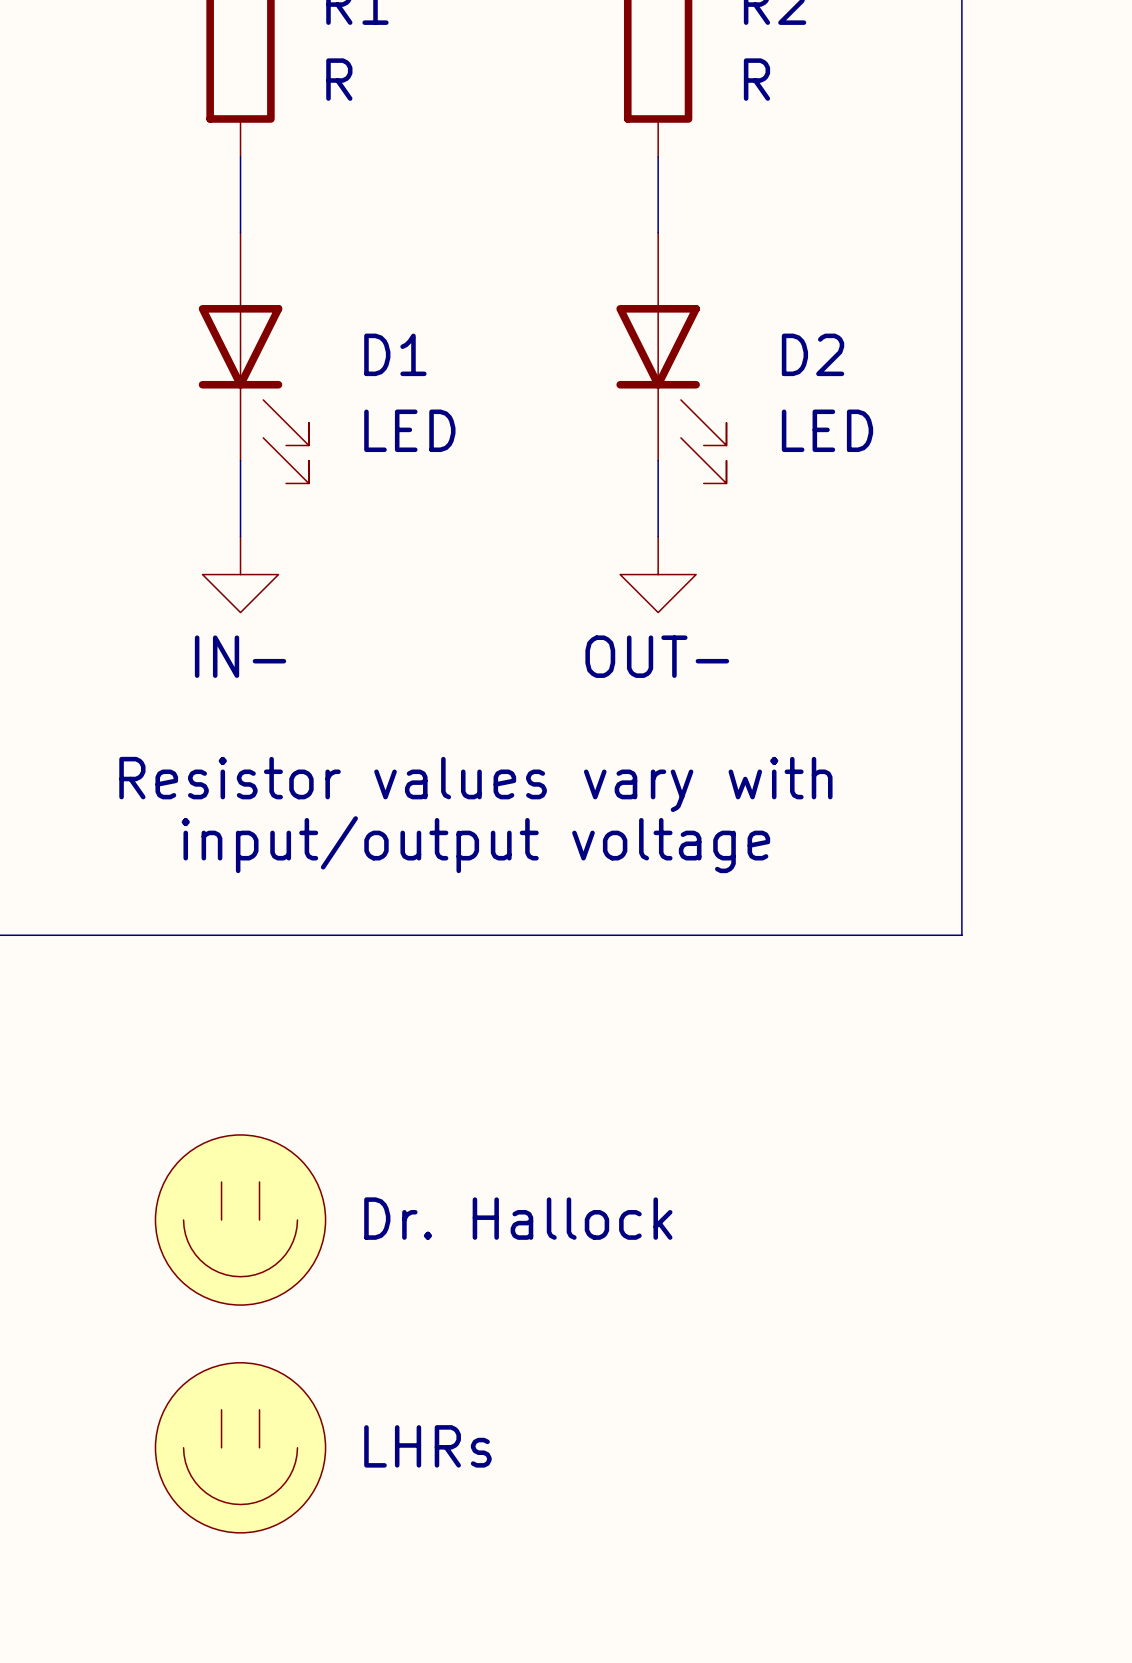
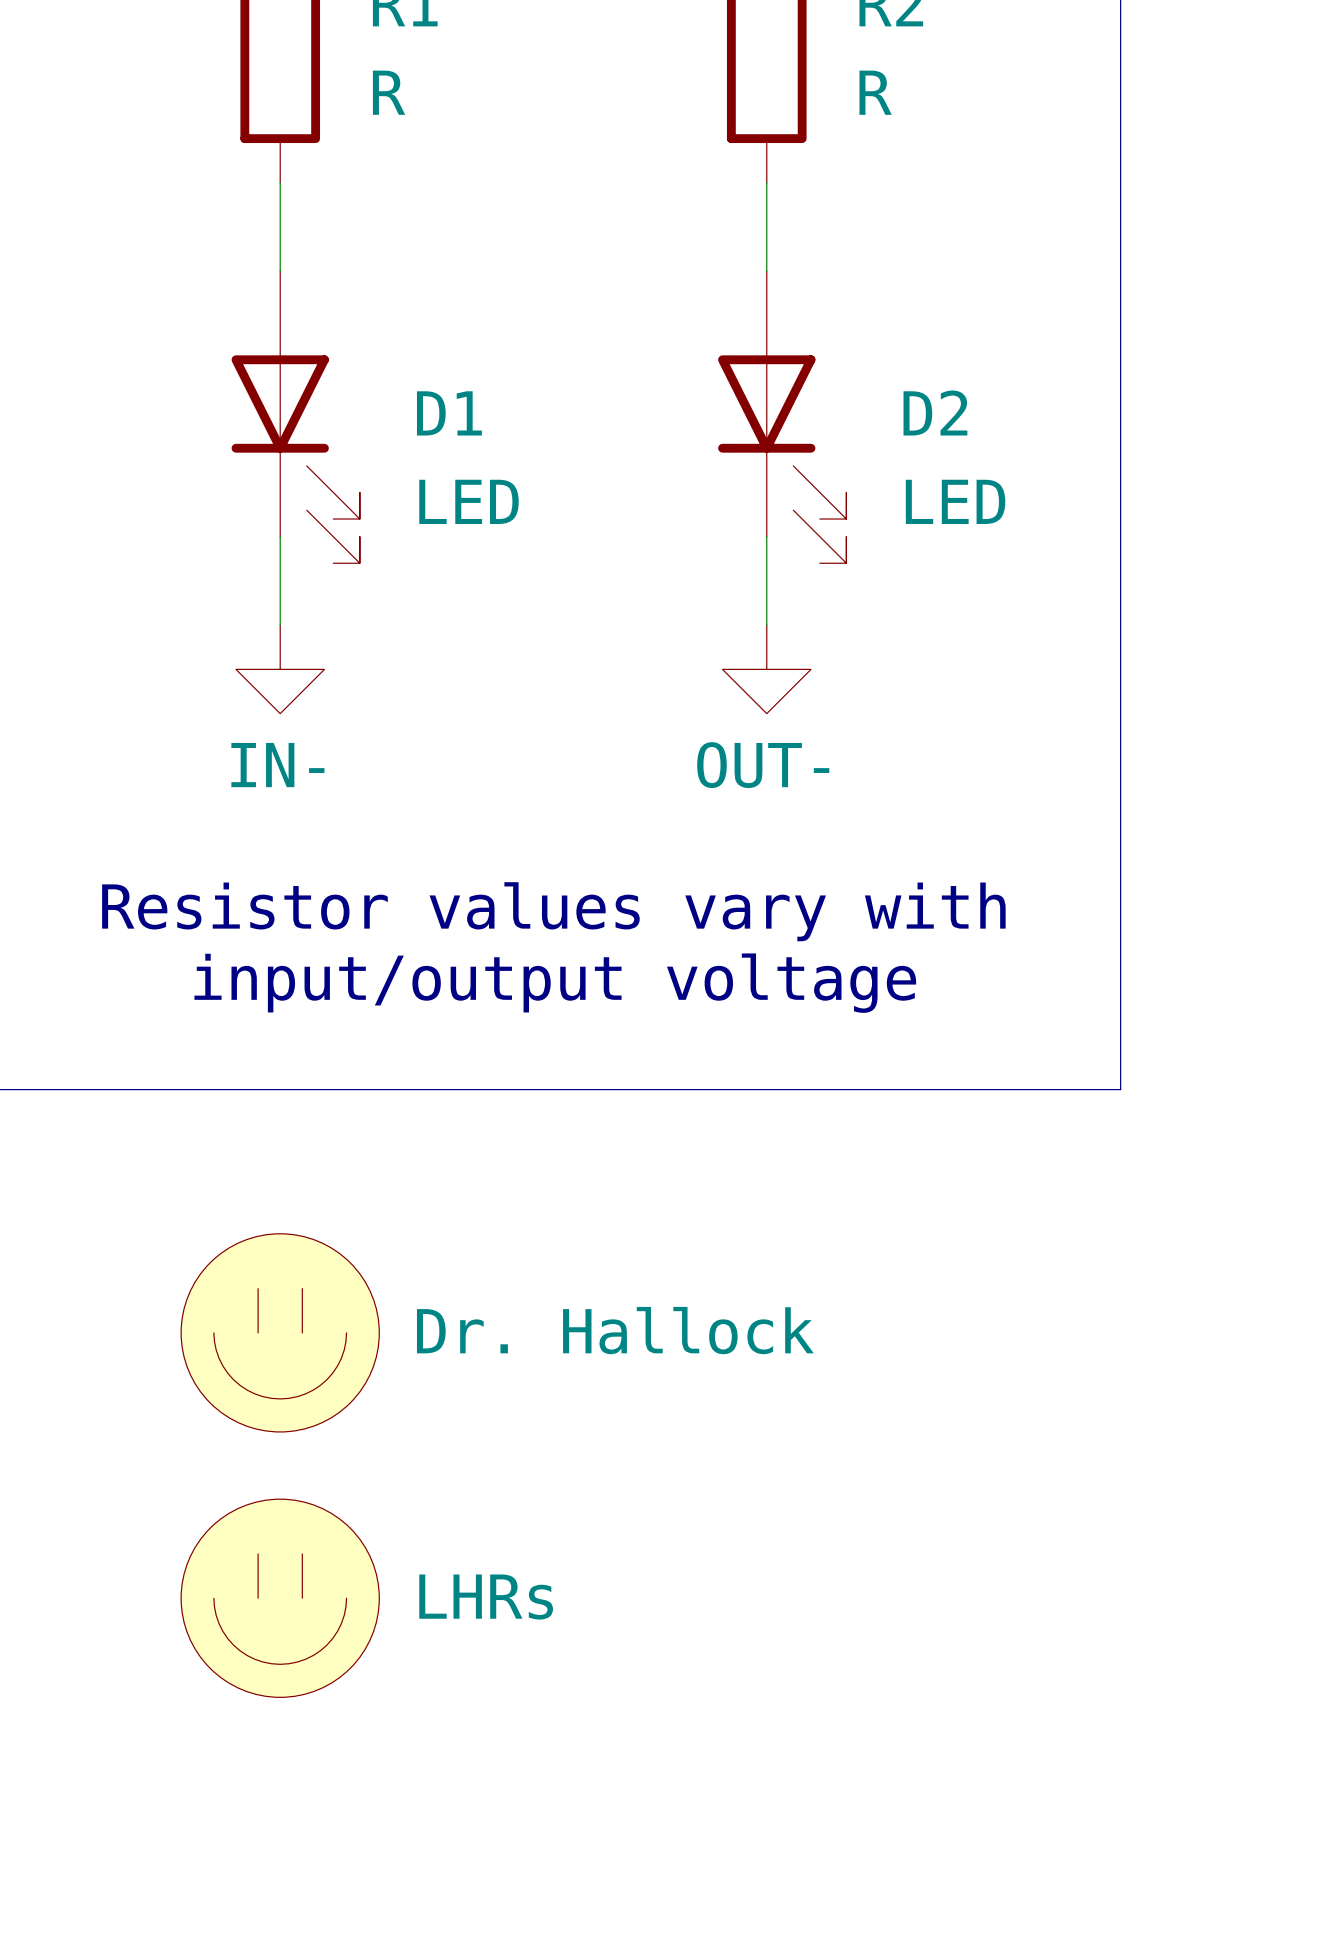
part position: (240, 1220) -> (280, 1332)
part position: (240, 1447) -> (280, 1598)

